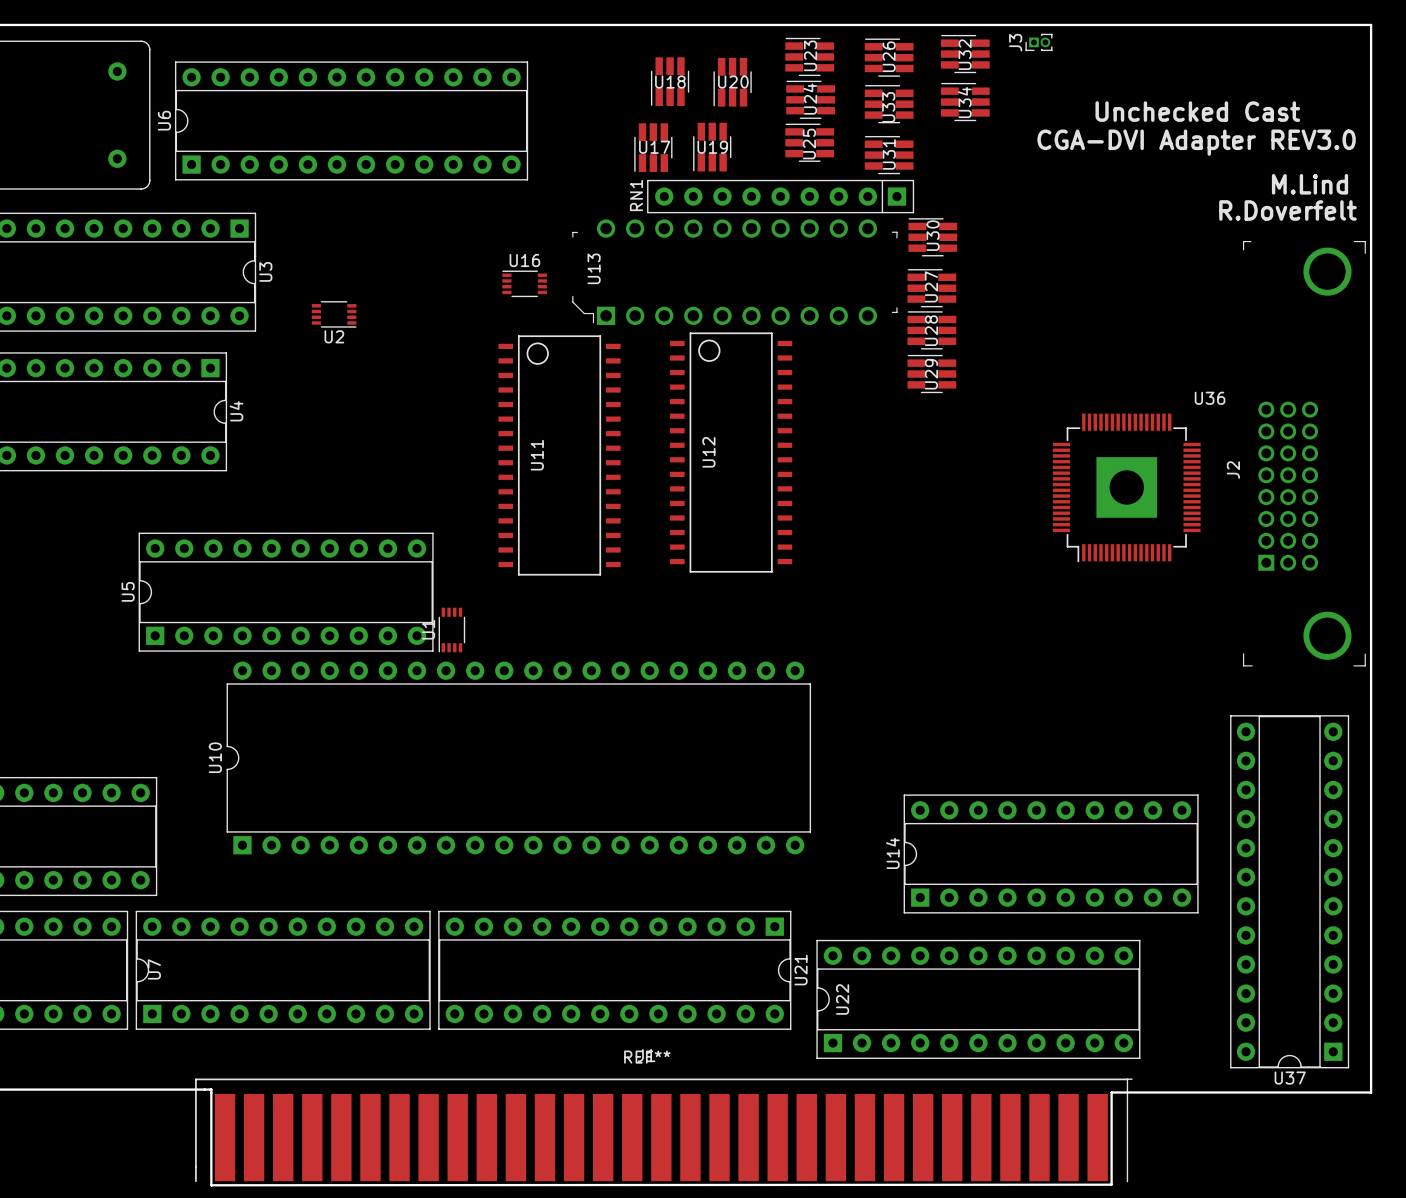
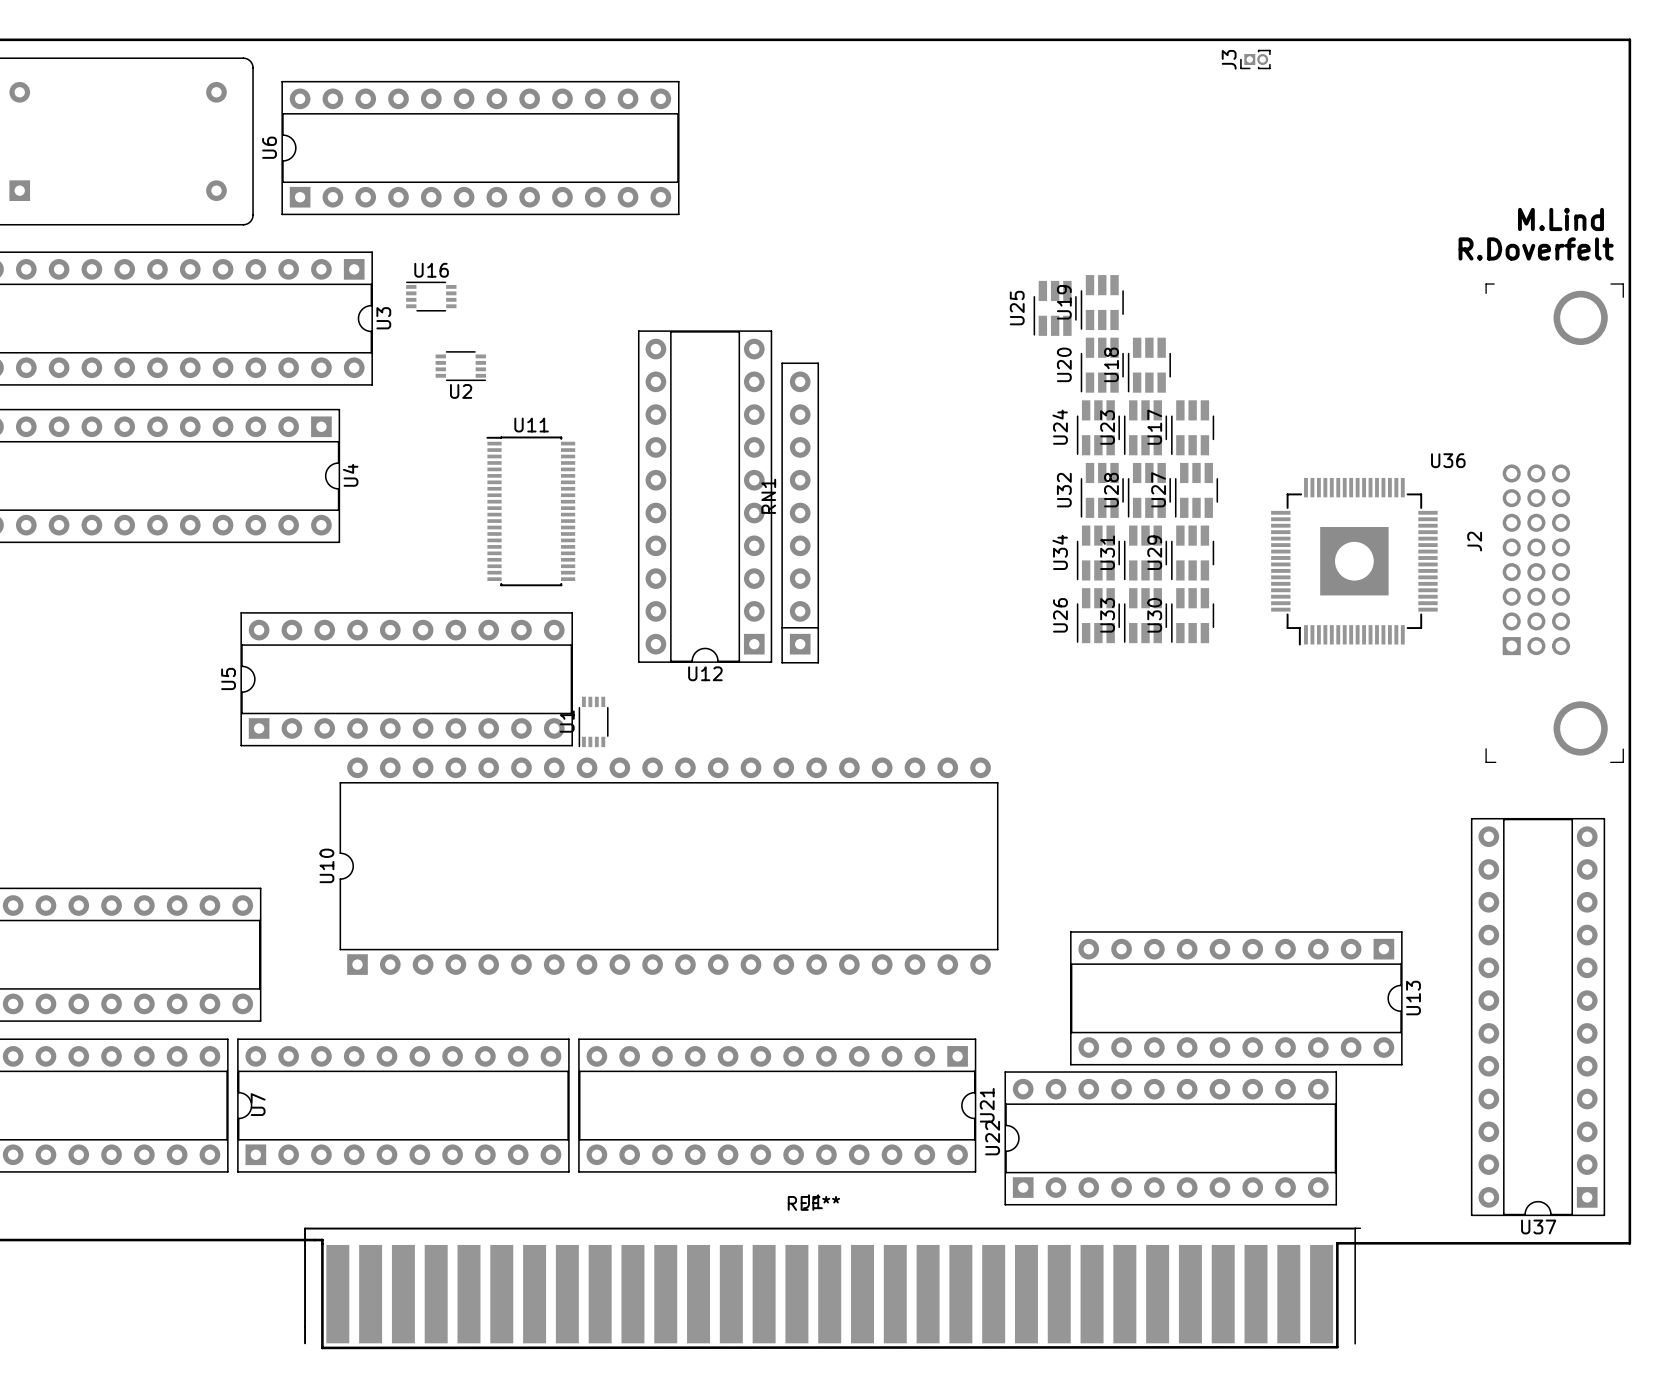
U32 rotation: 0° (965, 54) -> 90° counterclockwise (1102, 490)
U32 position: (965, 54) -> (1102, 490)
U32 name position: U32 (965, 54) -> U32 (1064, 490)
U23 name position: U23 (810, 55) -> U23 (1107, 427)
U23 rotation: 0° (809, 56) -> 90° counterclockwise (1145, 427)
U23 position: (809, 56) -> (1145, 427)
U26 name position: U26 (889, 56) -> U26 (1060, 615)
U26 rotation: 0° (889, 57) -> 90° counterclockwise (1098, 615)
U26 position: (889, 57) -> (1098, 615)
U18 position: (670, 81) -> (1149, 365)
U18 name rotation: 0° (670, 82) -> 90° counterclockwise (1111, 364)
U20 position: (732, 82) -> (1102, 365)
U20 name rotation: 0° (733, 82) -> 90° counterclockwise (1064, 364)
U24 rotation: 0° (810, 99) -> 90° counterclockwise (1098, 427)
U24 position: (810, 99) -> (1098, 427)
U24 name position: U24 (810, 99) -> U24 (1060, 427)
U34 name position: U34 (964, 102) -> U34 (1060, 552)
U34 rotation: 0° (965, 102) -> 90° counterclockwise (1098, 553)
U34 position: (965, 102) -> (1098, 553)
U33 rotation: 0° (889, 104) -> 90° counterclockwise (1145, 615)
U33 position: (889, 104) -> (1145, 615)
U33 name position: U33 (888, 107) -> U33 (1107, 615)
text: Unchecked Cast (1197, 111) -> none
U25 rotation: 0° (809, 142) -> 90° counterclockwise (1055, 308)
U25 position: (809, 142) -> (1055, 308)
text: CGA-DVI Adapter REV3.0 (1196, 142) -> none
U25 name position: U25 (809, 144) -> U25 (1017, 308)
U17 position: (653, 147) -> (1192, 427)
U17 name rotation: 0° (654, 147) -> 90° counterclockwise (1154, 427)
U19 position: (712, 147) -> (1102, 302)
U19 name rotation: 0° (712, 147) -> 90° counterclockwise (1064, 302)
U31 name position: U31 (889, 154) -> U31 (1107, 552)
U31 rotation: 0° (889, 155) -> 90° counterclockwise (1145, 553)
U31 position: (889, 155) -> (1145, 553)
RN1 name position: RN1 (636, 195) -> RN1 (768, 496)
RN1 rotation: 0° (780, 196) -> 90° clockwise (800, 513)
RN1 position: (780, 196) -> (800, 513)
U13 footprint: [572, 219, 898, 325] -> [1070, 931, 1403, 1066]
U30 name position: U30 (933, 235) -> U30 (1154, 615)
U30 rotation: 0° (932, 237) -> 90° counterclockwise (1192, 615)
U30 position: (932, 237) -> (1192, 615)
U13 name position: U13 (594, 268) -> U13 (1413, 998)
U16 position: (524, 283) -> (431, 296)
U27 name position: U27 (931, 286) -> U27 (1158, 489)
U27 rotation: 0° (931, 288) -> 90° counterclockwise (1196, 490)
U27 position: (931, 288) -> (1196, 490)
U28 rotation: 0° (931, 330) -> 90° counterclockwise (1149, 490)
U28 position: (931, 330) -> (1149, 490)
U28 name position: U28 (931, 330) -> U28 (1111, 490)
U12 footprint: [670, 332, 793, 573] -> [637, 330, 773, 663]
U11 footprint: [498, 335, 621, 576] -> [486, 436, 576, 587]
U29 rotation: 0° (931, 374) -> 90° counterclockwise (1192, 553)
U29 position: (931, 374) -> (1192, 553)
U29 name position: U29 (931, 374) -> U29 (1154, 552)
U12 name position: U12 (708, 452) -> U12 (705, 673)
U11 name position: U11 (537, 455) -> U11 (531, 425)
U14: (1051, 853) -> none
U22 footprint: [816, 939, 1141, 1059] -> [1004, 1071, 1338, 1206]

